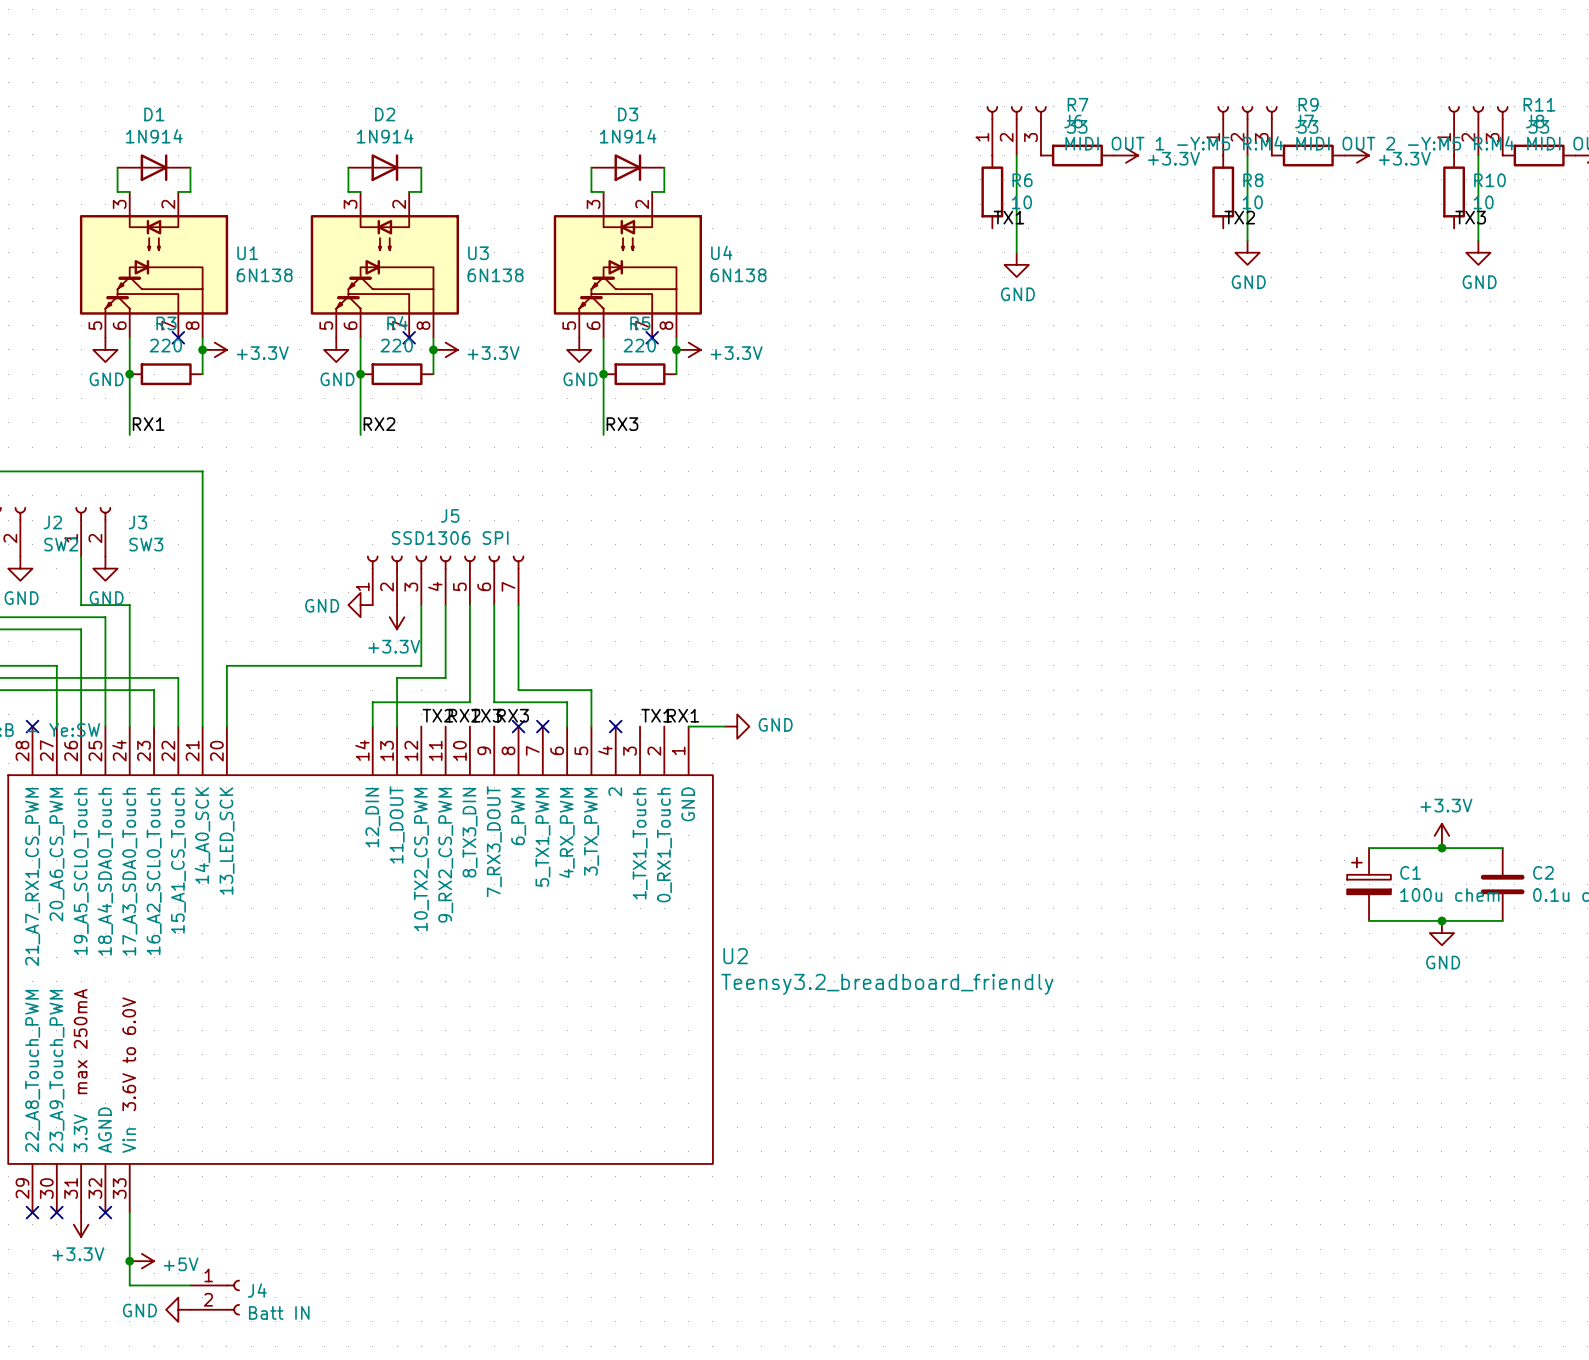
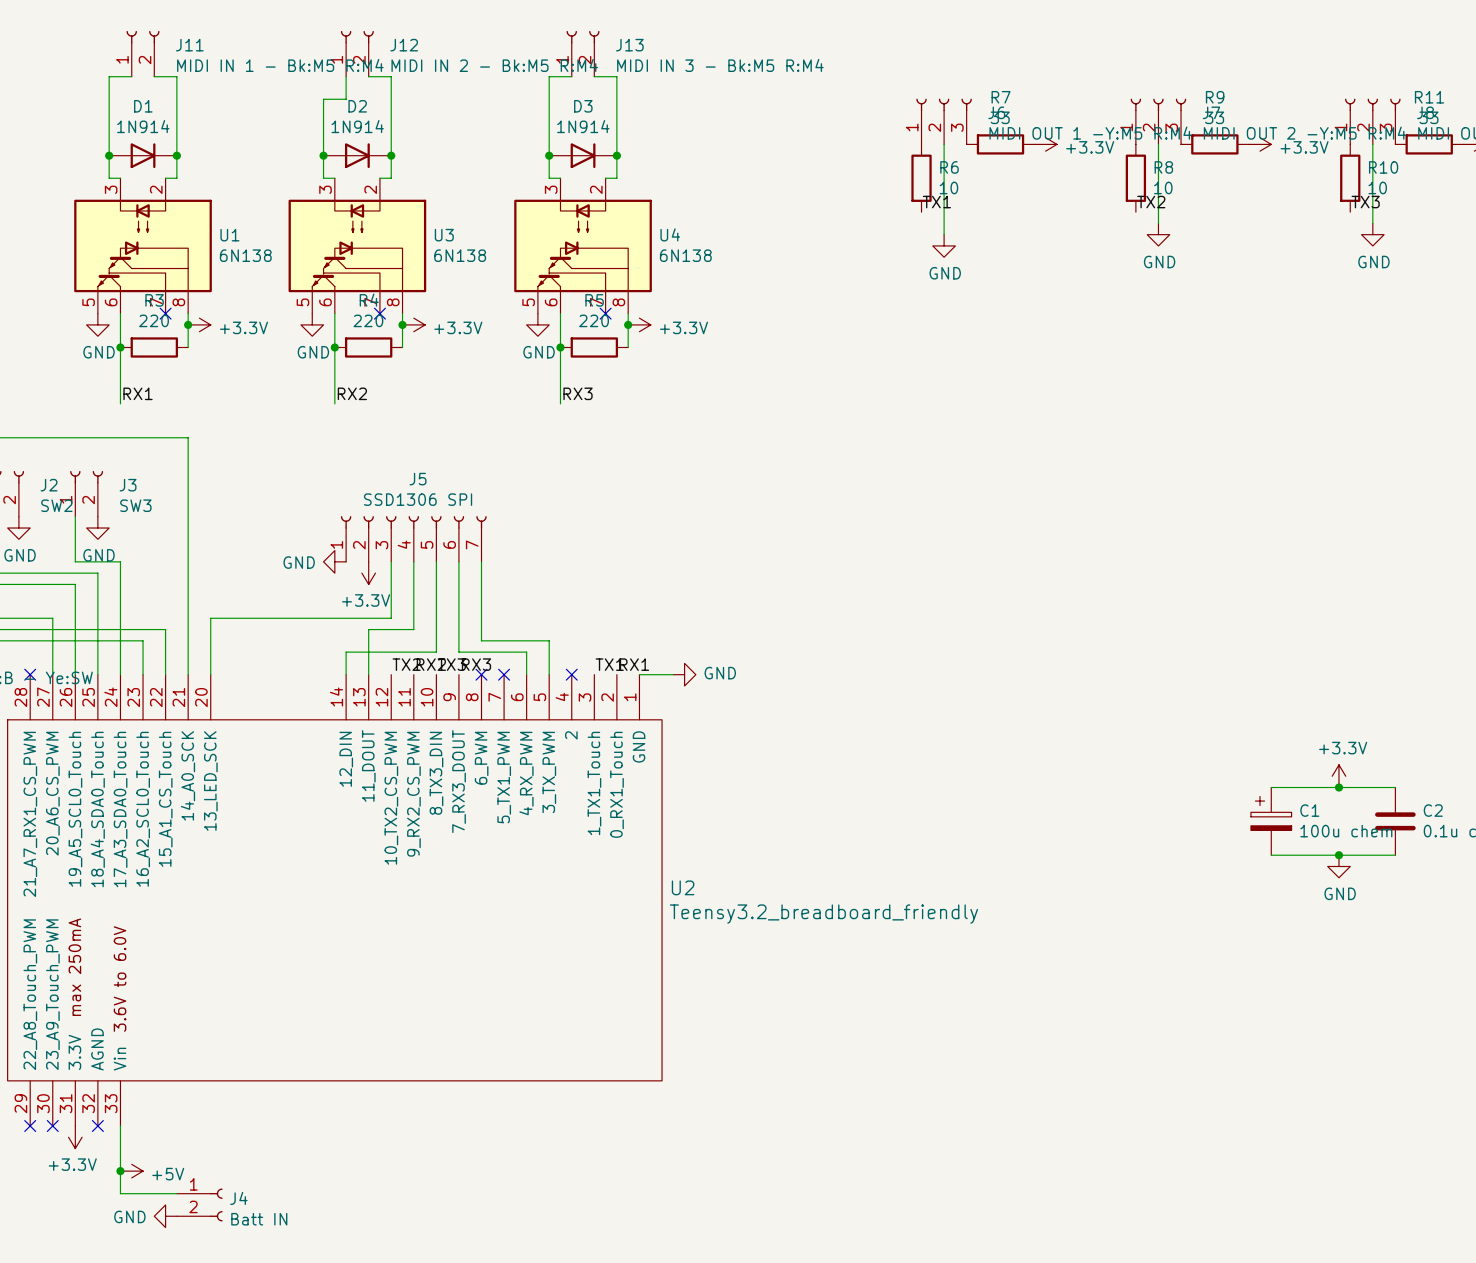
J11: none -> MIDI IN 1 - Bk:M5 R:M4 (143, 53)
J12: none -> MIDI IN 2 - Bk:M5 R:M4 (357, 53)
J13: none -> MIDI IN 3 - Bk:M5 R:M4 (583, 53)
wire: none -> (131, 76) (109, 76) (109, 155)
wire: none -> (154, 76) (176, 76) (176, 155)
wire: none -> (346, 76) (346, 99) (323, 99) (323, 155)
wire: none -> (368, 76) (391, 76) (391, 155)
wire: none -> (571, 76) (549, 76) (549, 155)
wire: none -> (594, 76) (616, 76) (616, 155)
junction: none -> (109, 155)
junction: none -> (176, 155)
junction: none -> (323, 155)
junction: none -> (391, 155)
junction: none -> (549, 155)
junction: none -> (616, 155)

